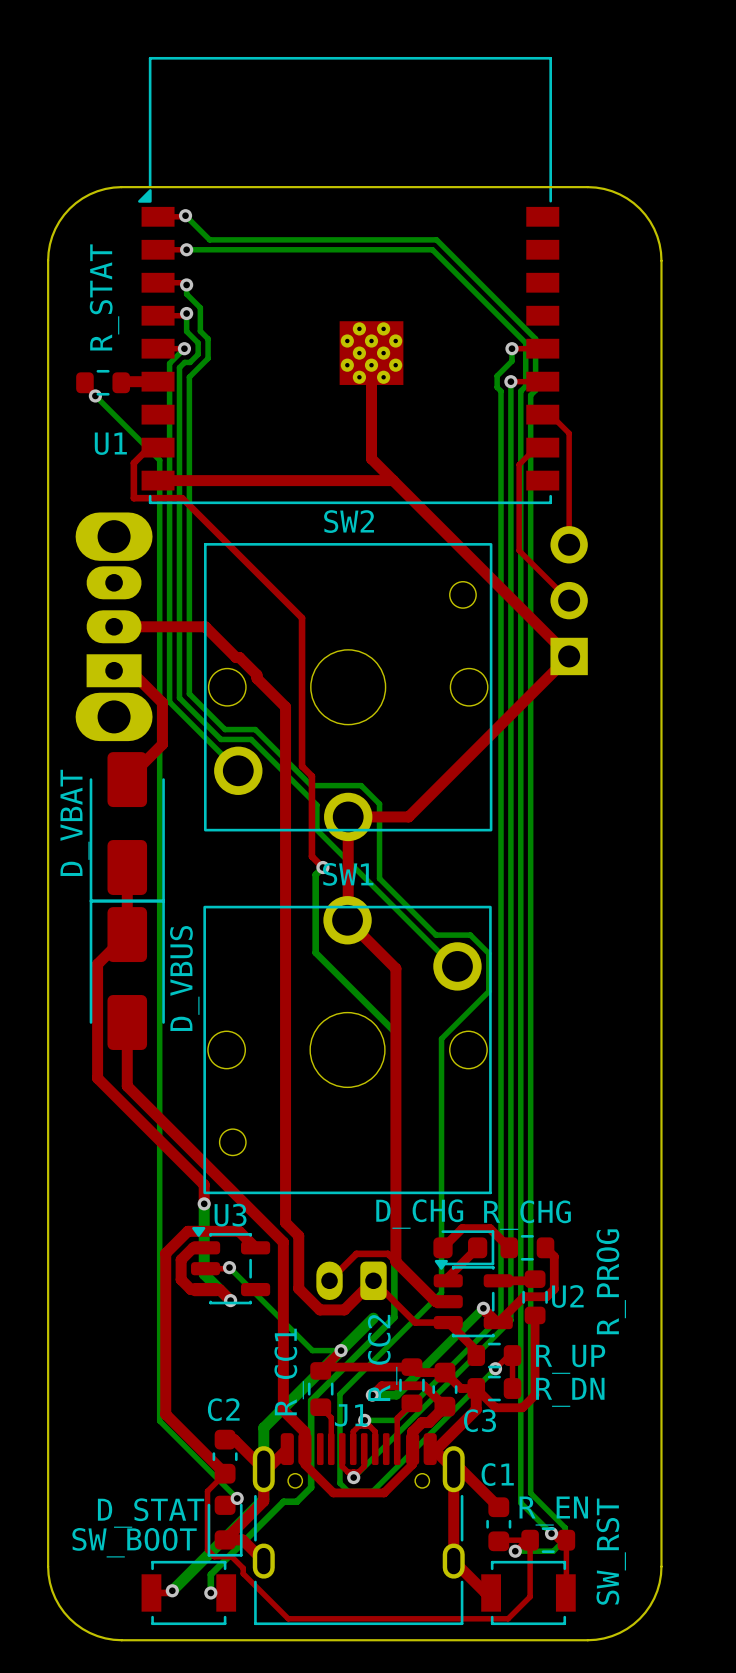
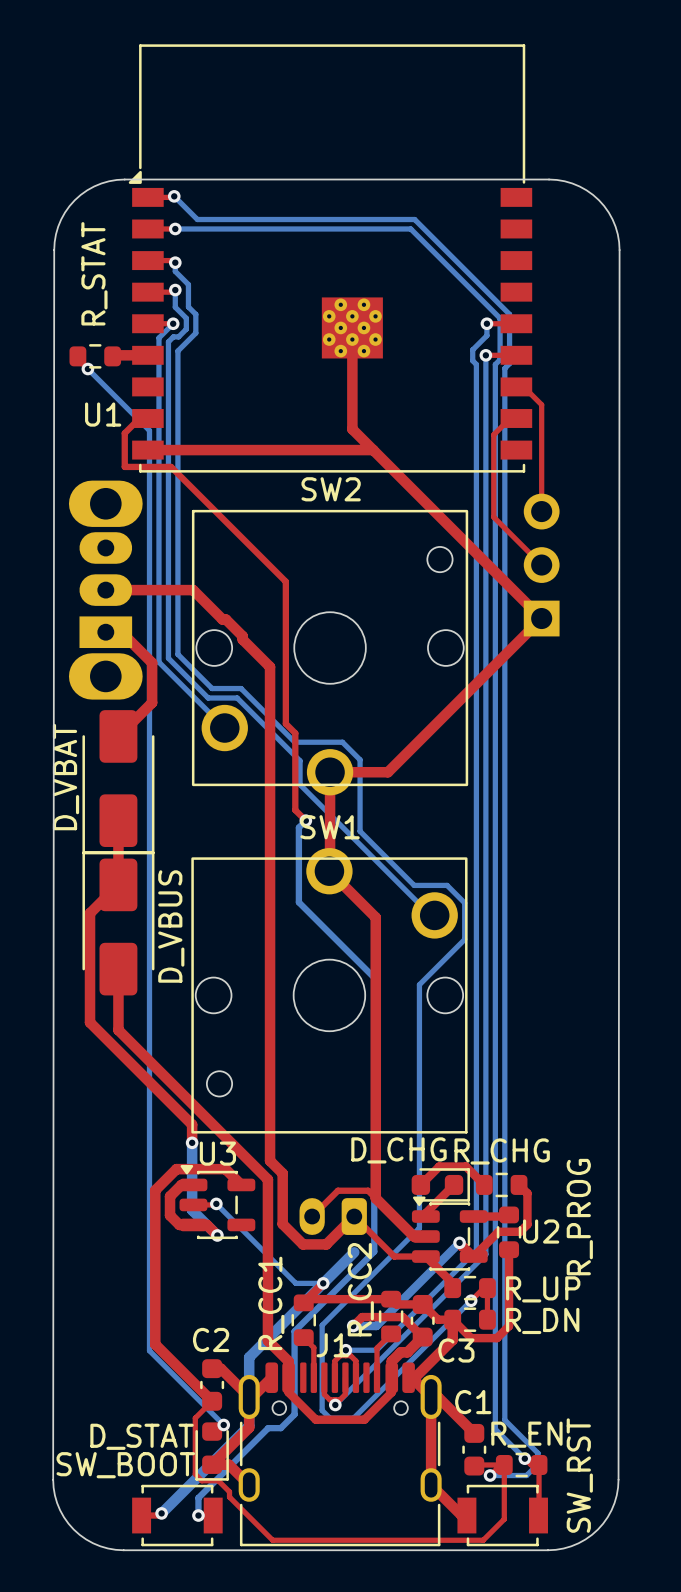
board edge: (121, 187) (596, 187) (612, 191) (633, 203) (645, 214) (657, 236) (661, 260) (661, 1566) (657, 1590) (650, 1605) (633, 1624) (612, 1636) (587, 1640) (113, 1639) (97, 1636) (75, 1624) (64, 1612) (52, 1590) (48, 1566) (48, 260) (49, 244) (55, 228) (69, 208) (89, 194) (105, 188) (121, 187) -> (124, 179) (109, 181) (94, 186) (74, 200) (65, 212) (58, 226) (54, 250) (53, 1479) (57, 1503) (63, 1517) (79, 1534) (100, 1546) (115, 1549) (547, 1550) (571, 1546) (591, 1534) (607, 1517) (616, 1495) (618, 1479) (619, 250) (615, 226) (608, 212) (593, 194) (572, 183) (556, 179) (124, 179)

